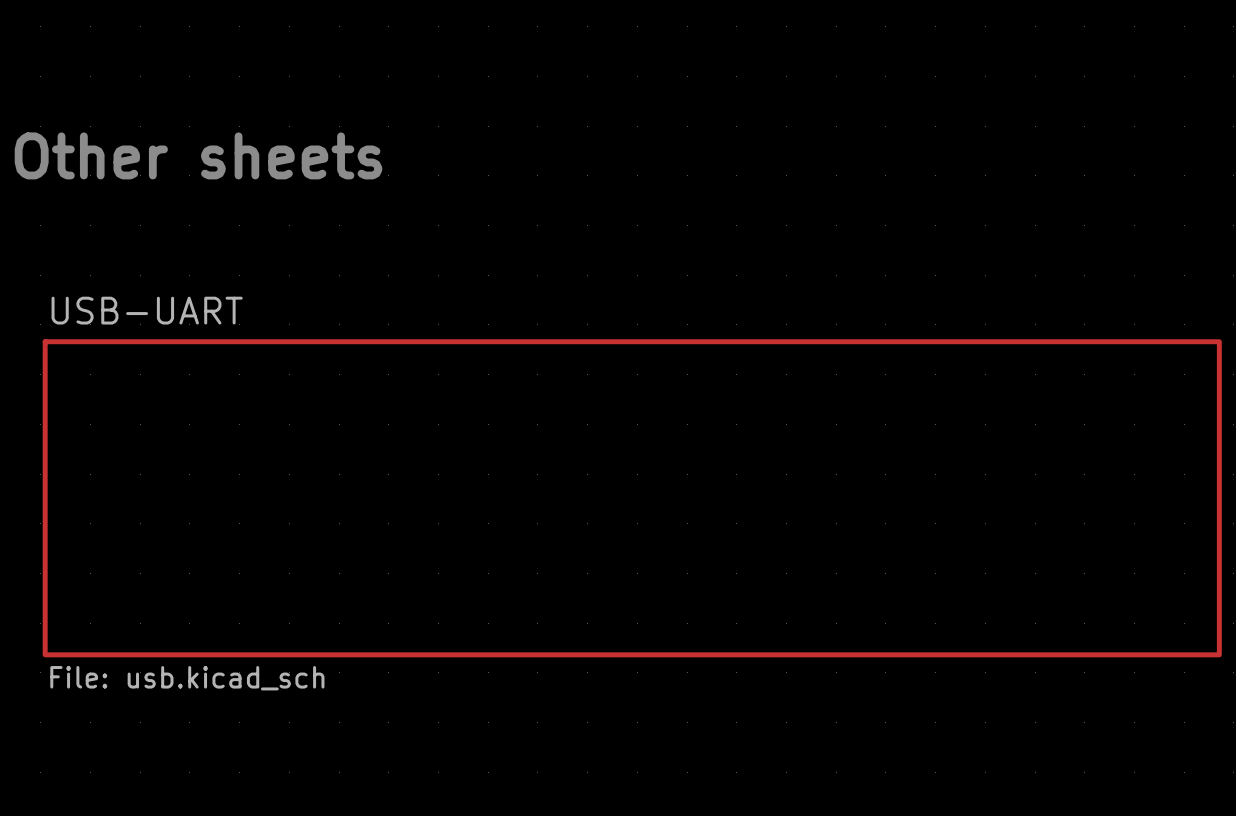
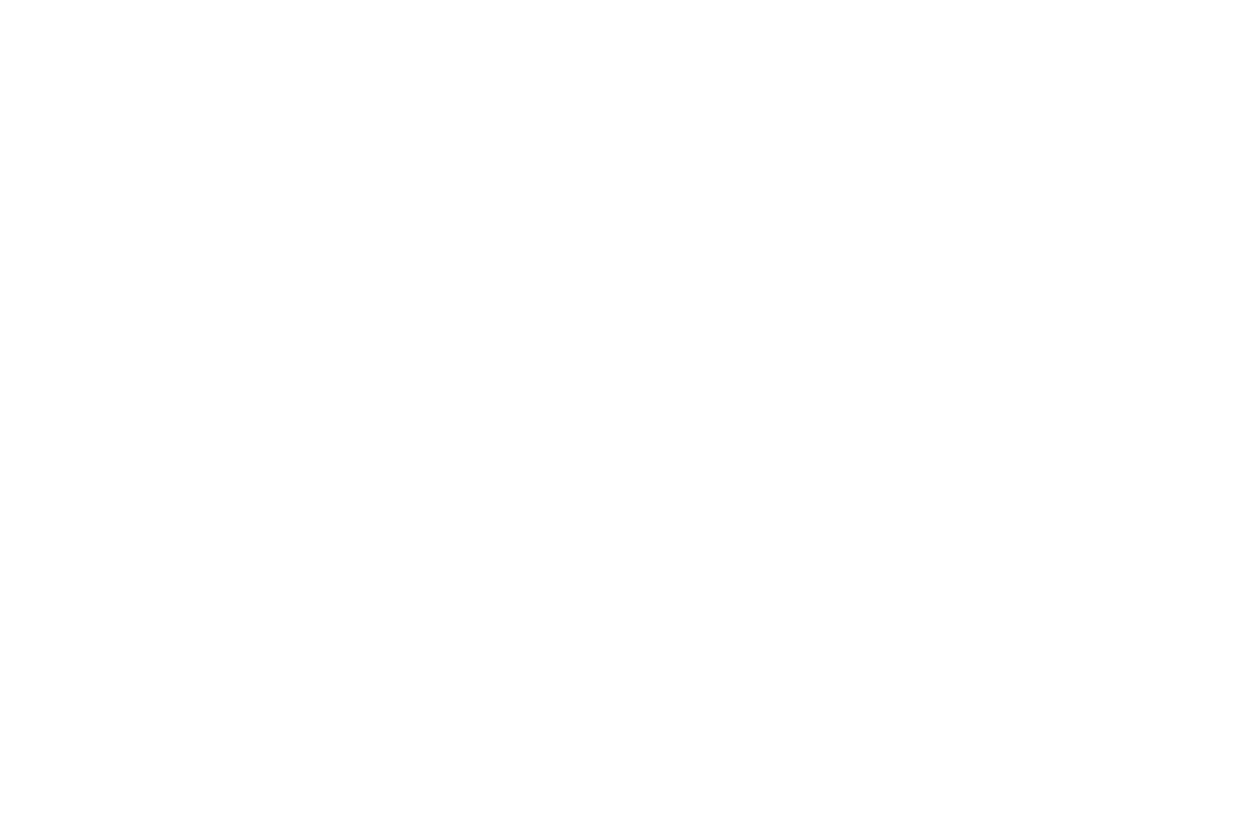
text: Other sheets (198, 155) -> none
sheet USB-UART: File: usb.kicad_sch (632, 498) -> none

